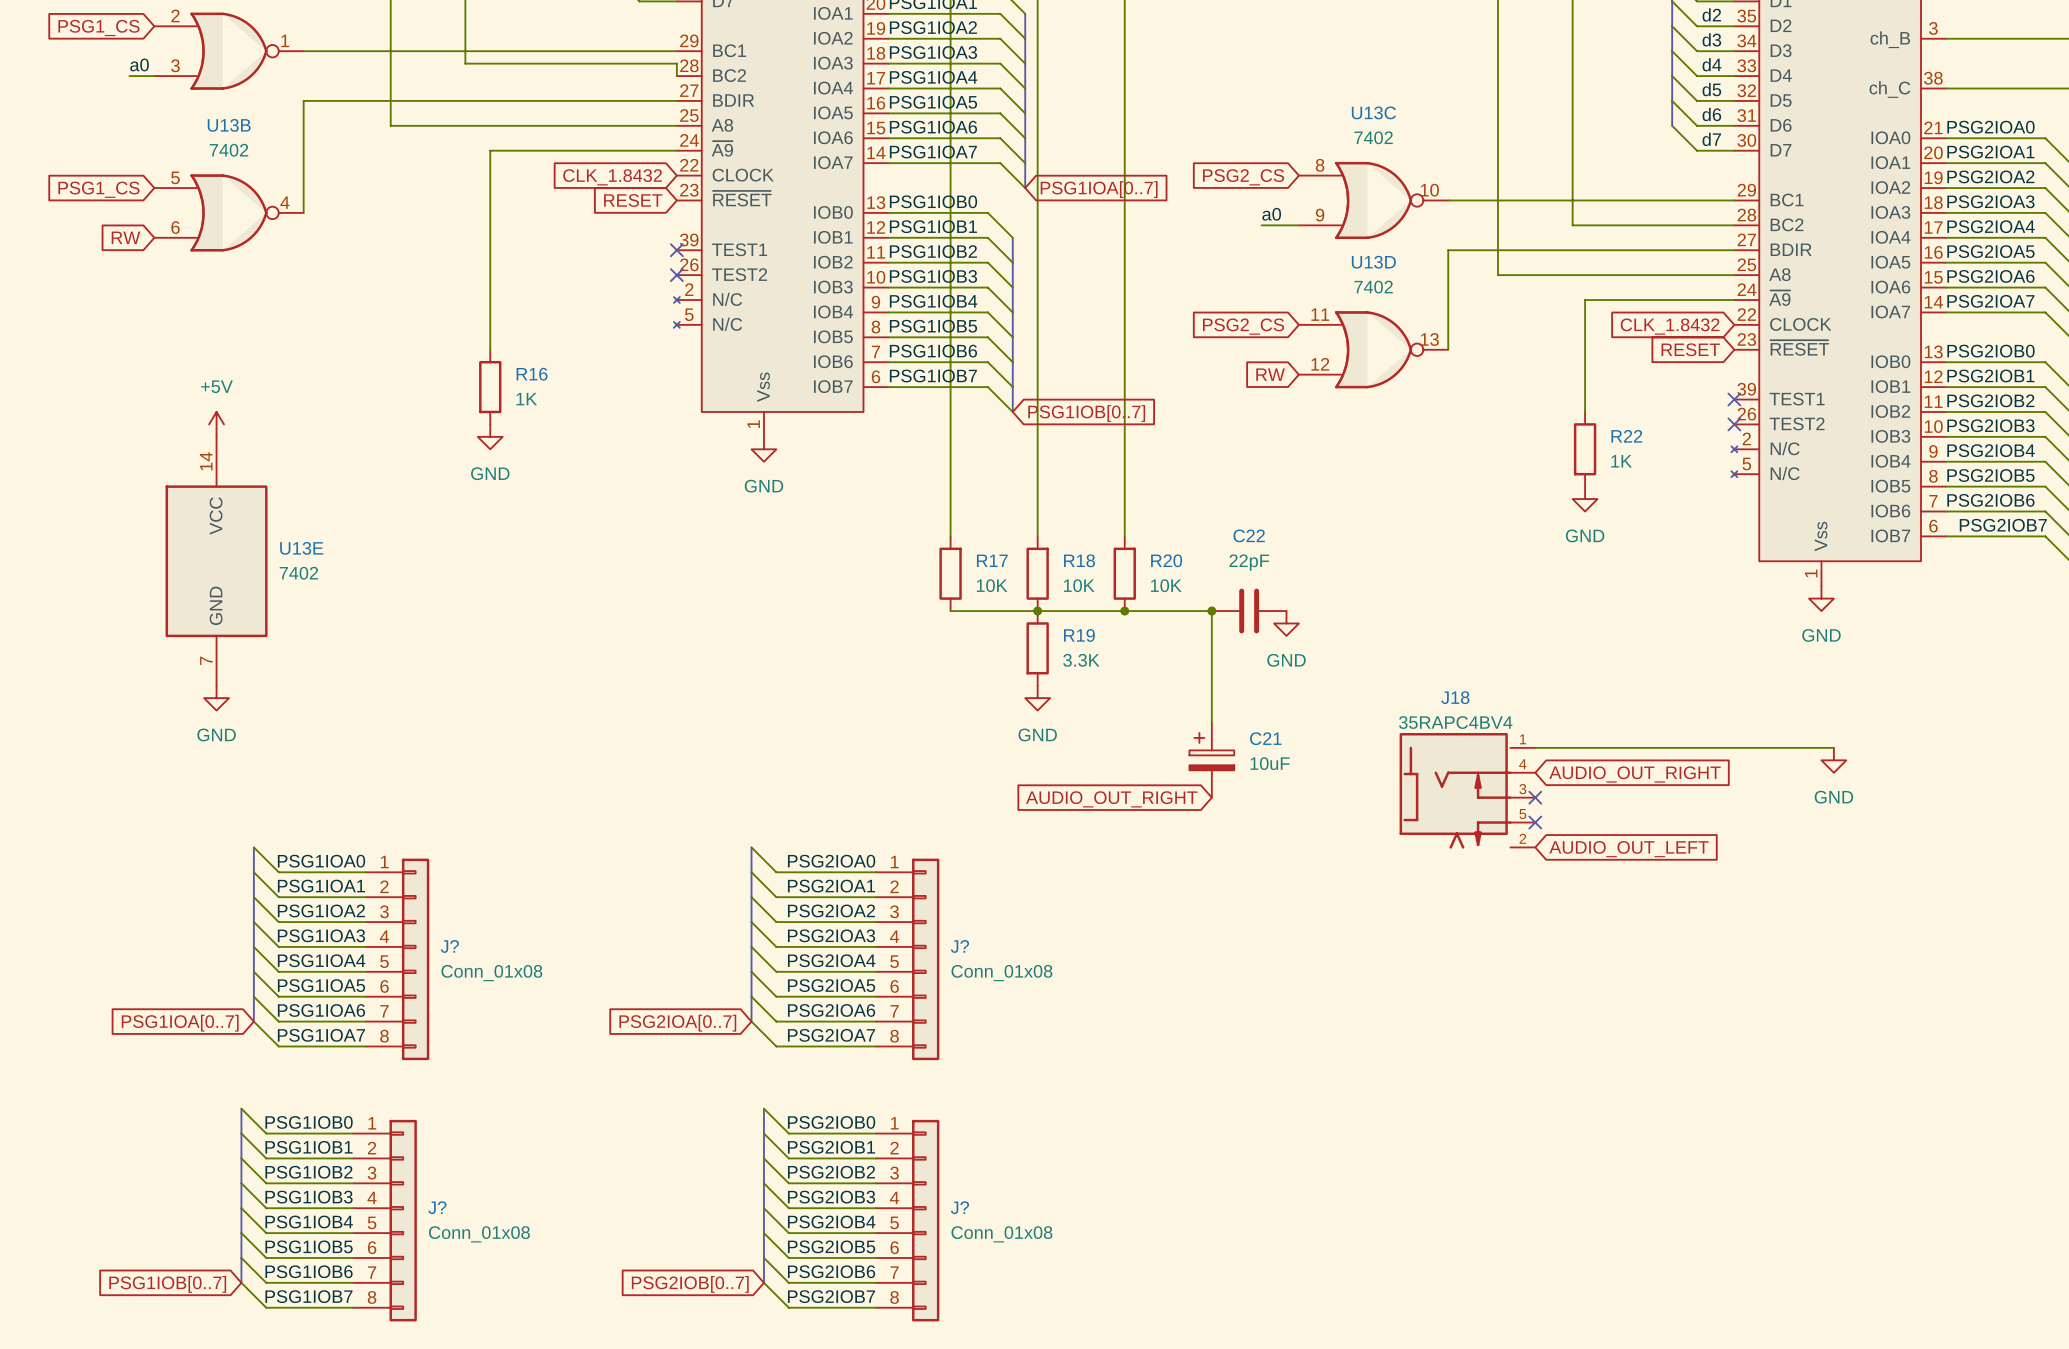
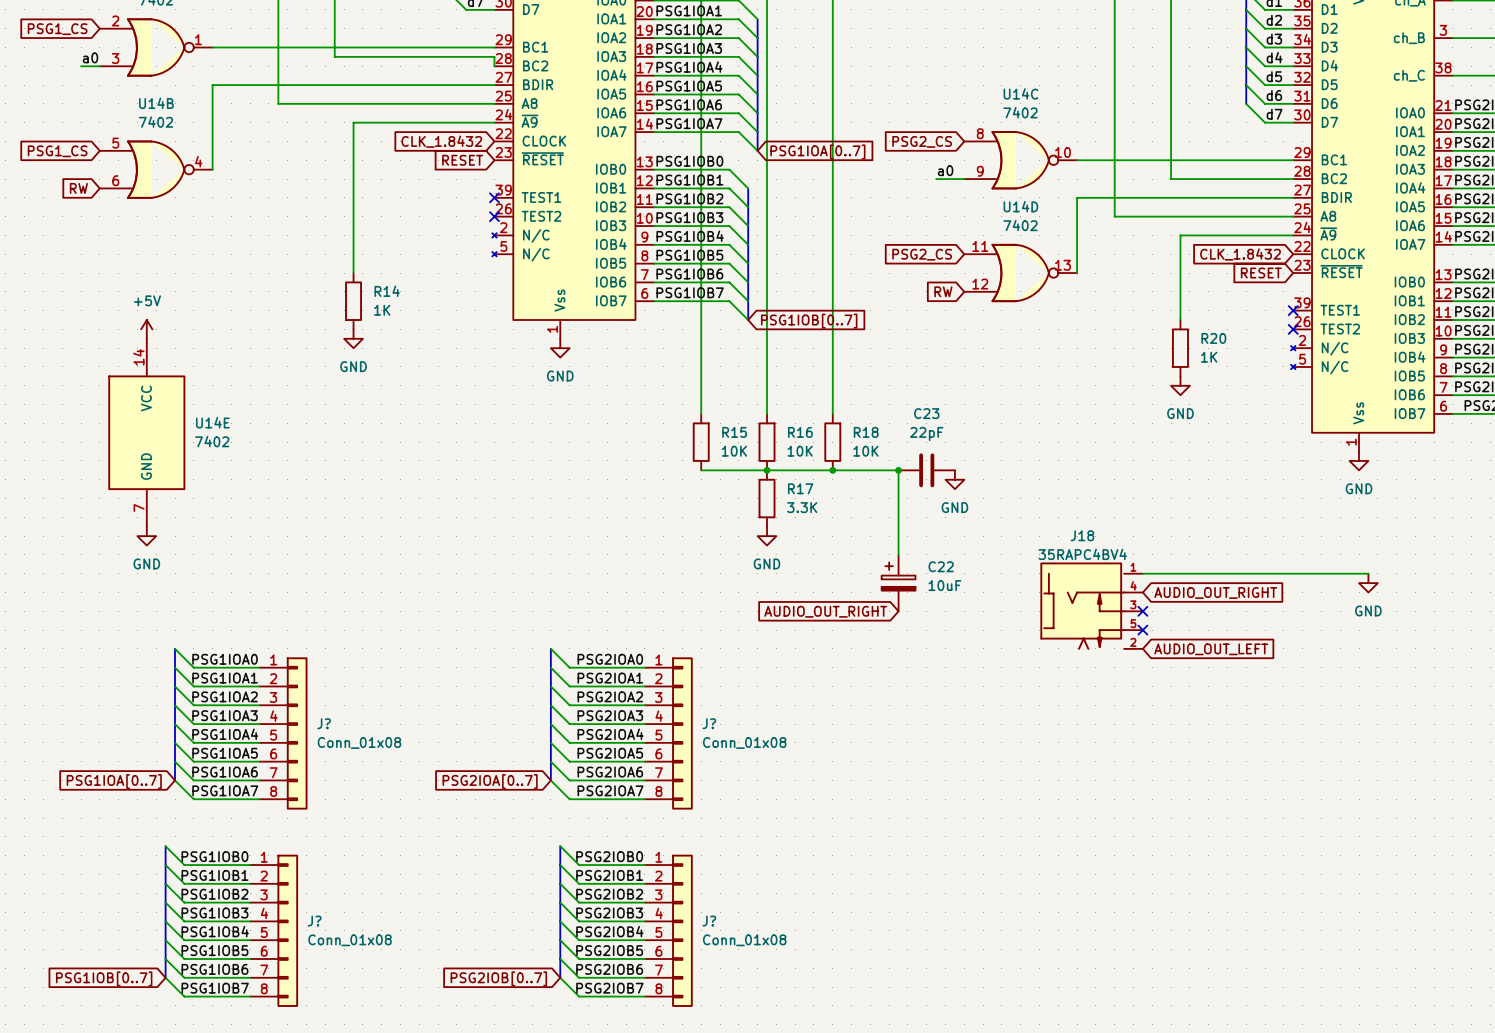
U13C name: U13C (1373, 112) -> U14C (1020, 93)
U13B name: U13B (229, 125) -> U14B (156, 103)
U13D name: U13D (1373, 262) -> U14D (1020, 206)
R16 name: R16 (532, 374) -> R14 (387, 291)
R22 name: R22 (1626, 436) -> R20 (1213, 338)
C22 name: C22 (1249, 535) -> C23 (926, 413)
U13E name: U13E (301, 548) -> U14E (212, 422)
R17 name: R17 (992, 560) -> R15 (734, 432)
R18 name: R18 (1079, 560) -> R16 (800, 432)
R20 name: R20 (1166, 560) -> R18 (866, 432)
R19 name: R19 (1079, 635) -> R17 (800, 488)
C21 name: C21 (1265, 738) -> C22 (941, 566)

